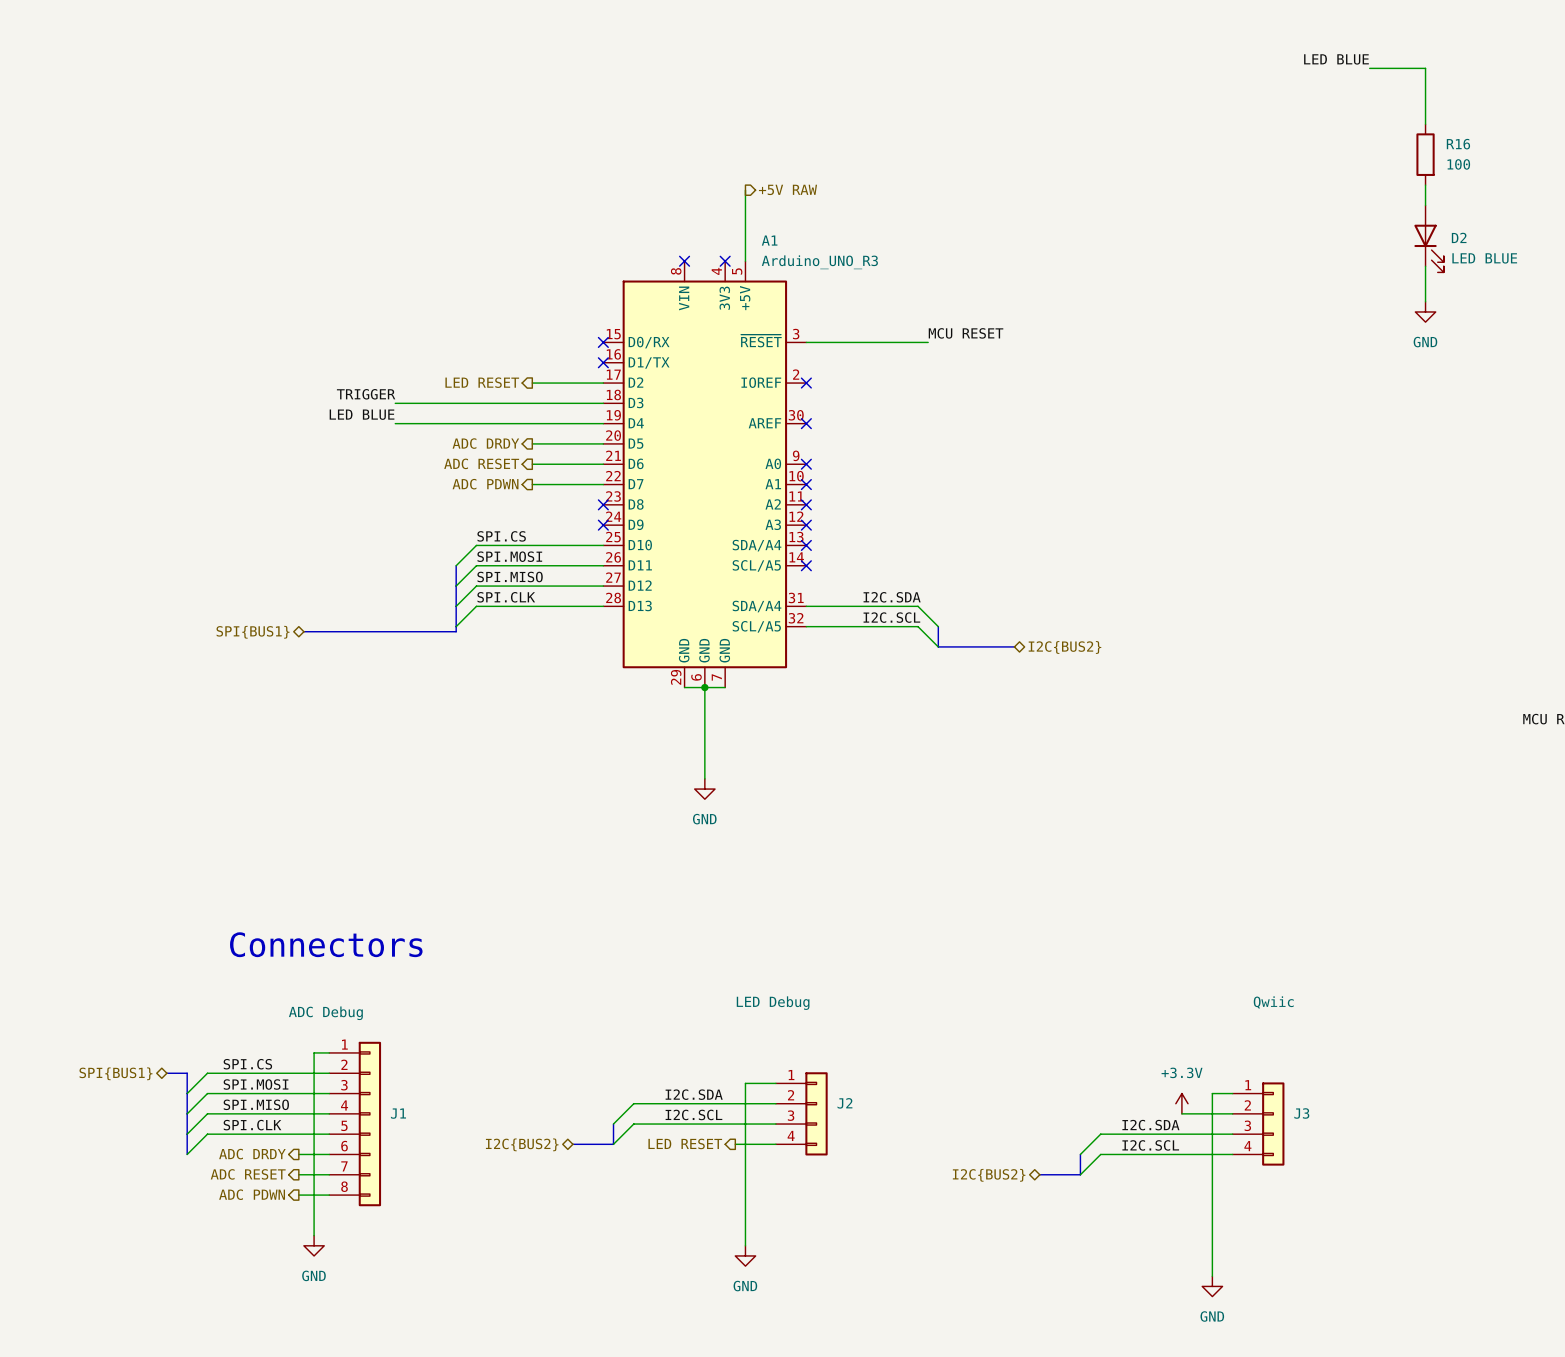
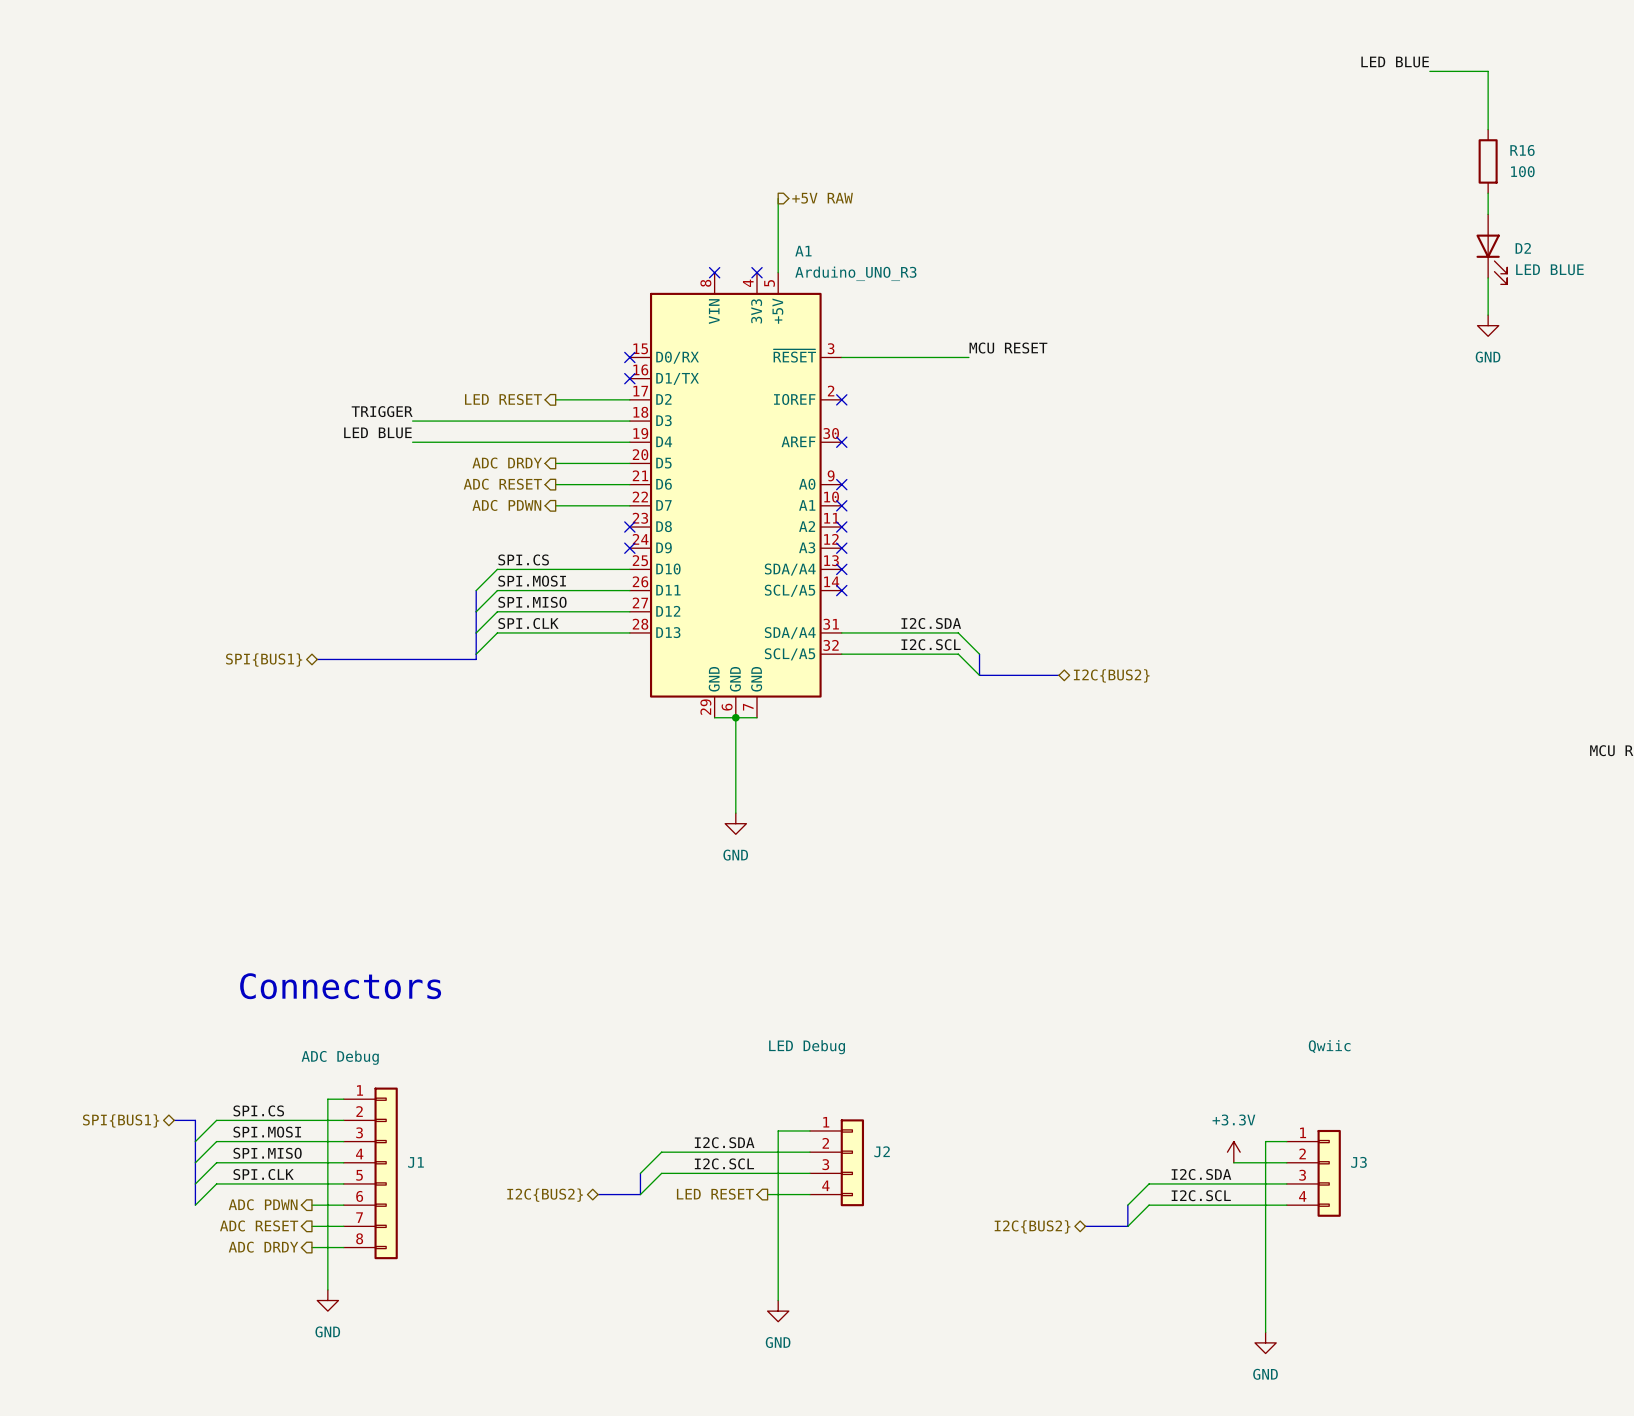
hierarchical label: ADC DRDY (252, 1154) -> ADC PDWN (263, 1204)
hierarchical label: ADC PDWN (252, 1194) -> ADC DRDY (263, 1247)

